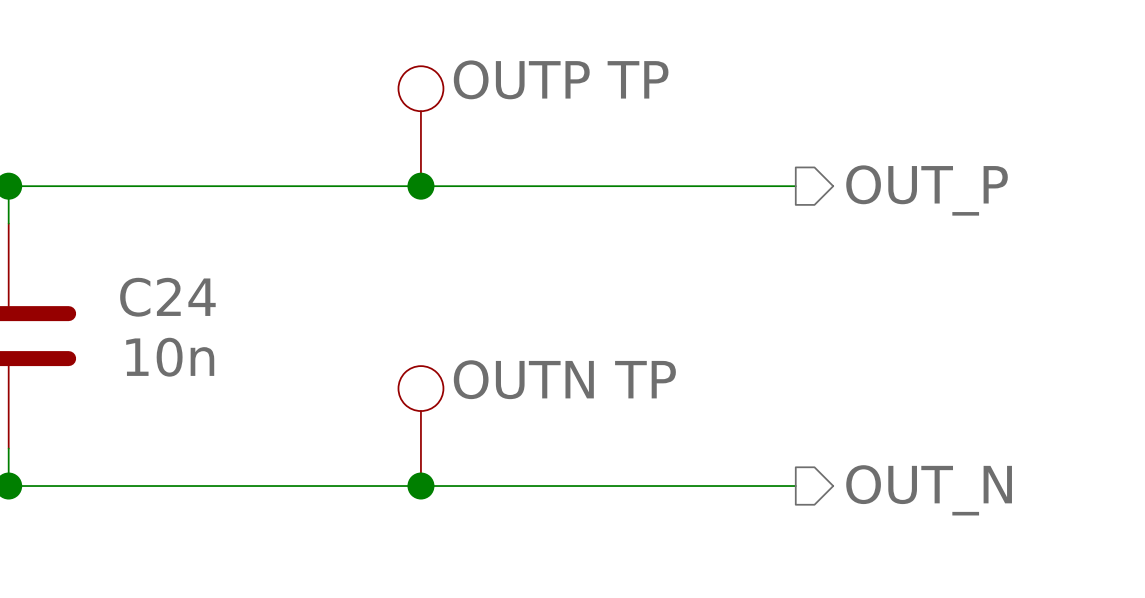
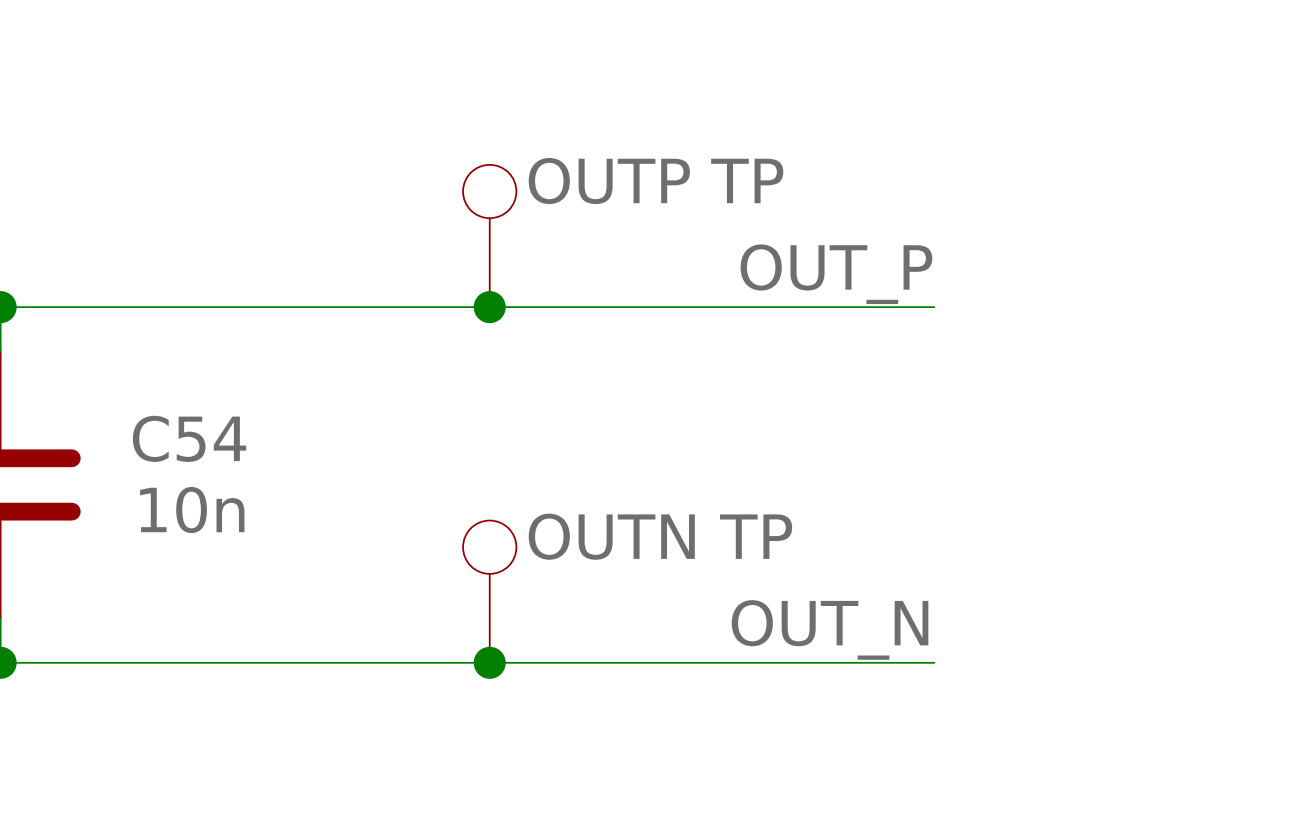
label: none -> OUT_P (836, 274)
hierarchical label: OUT_P (927, 190) -> none
C24 name: C24 (167, 297) -> C54 (189, 438)
label: none -> OUT_N (830, 629)
hierarchical label: OUT_N (929, 490) -> none

